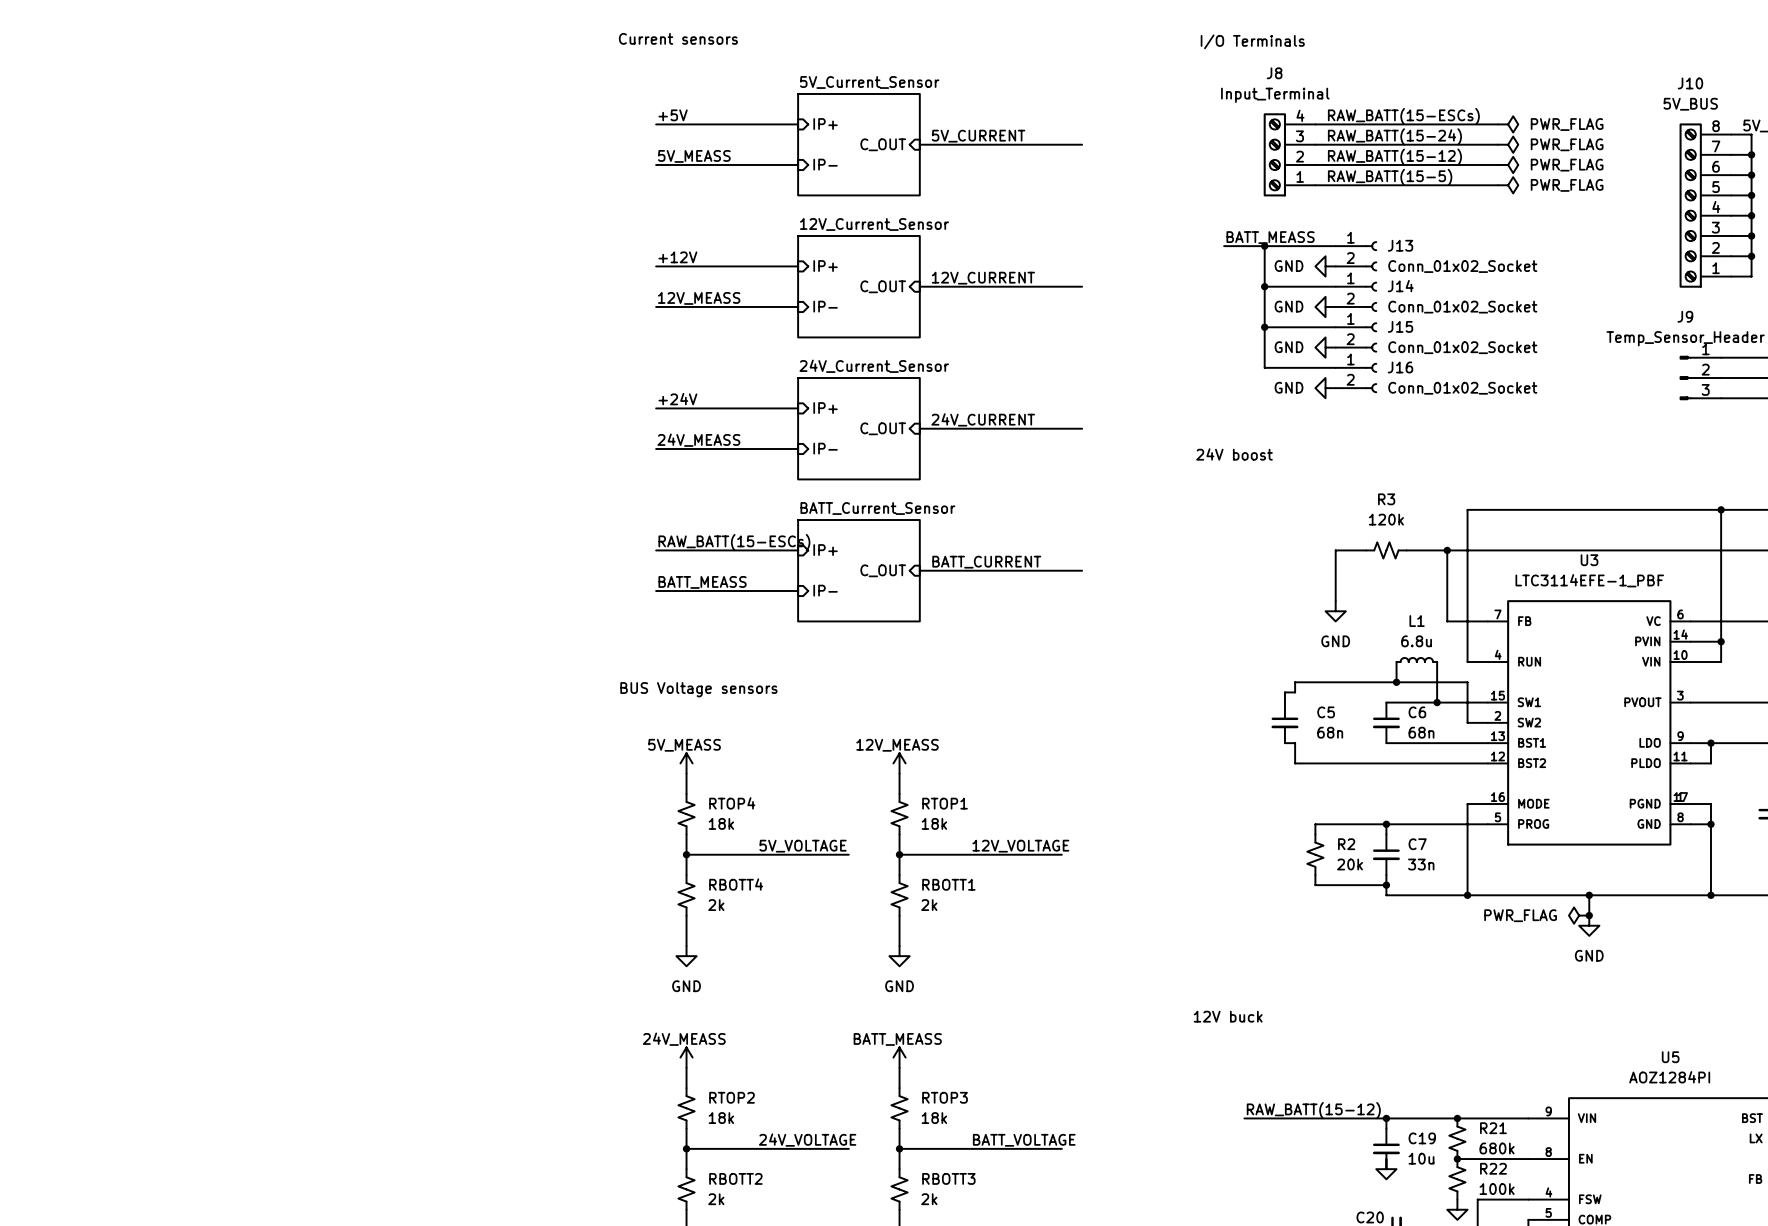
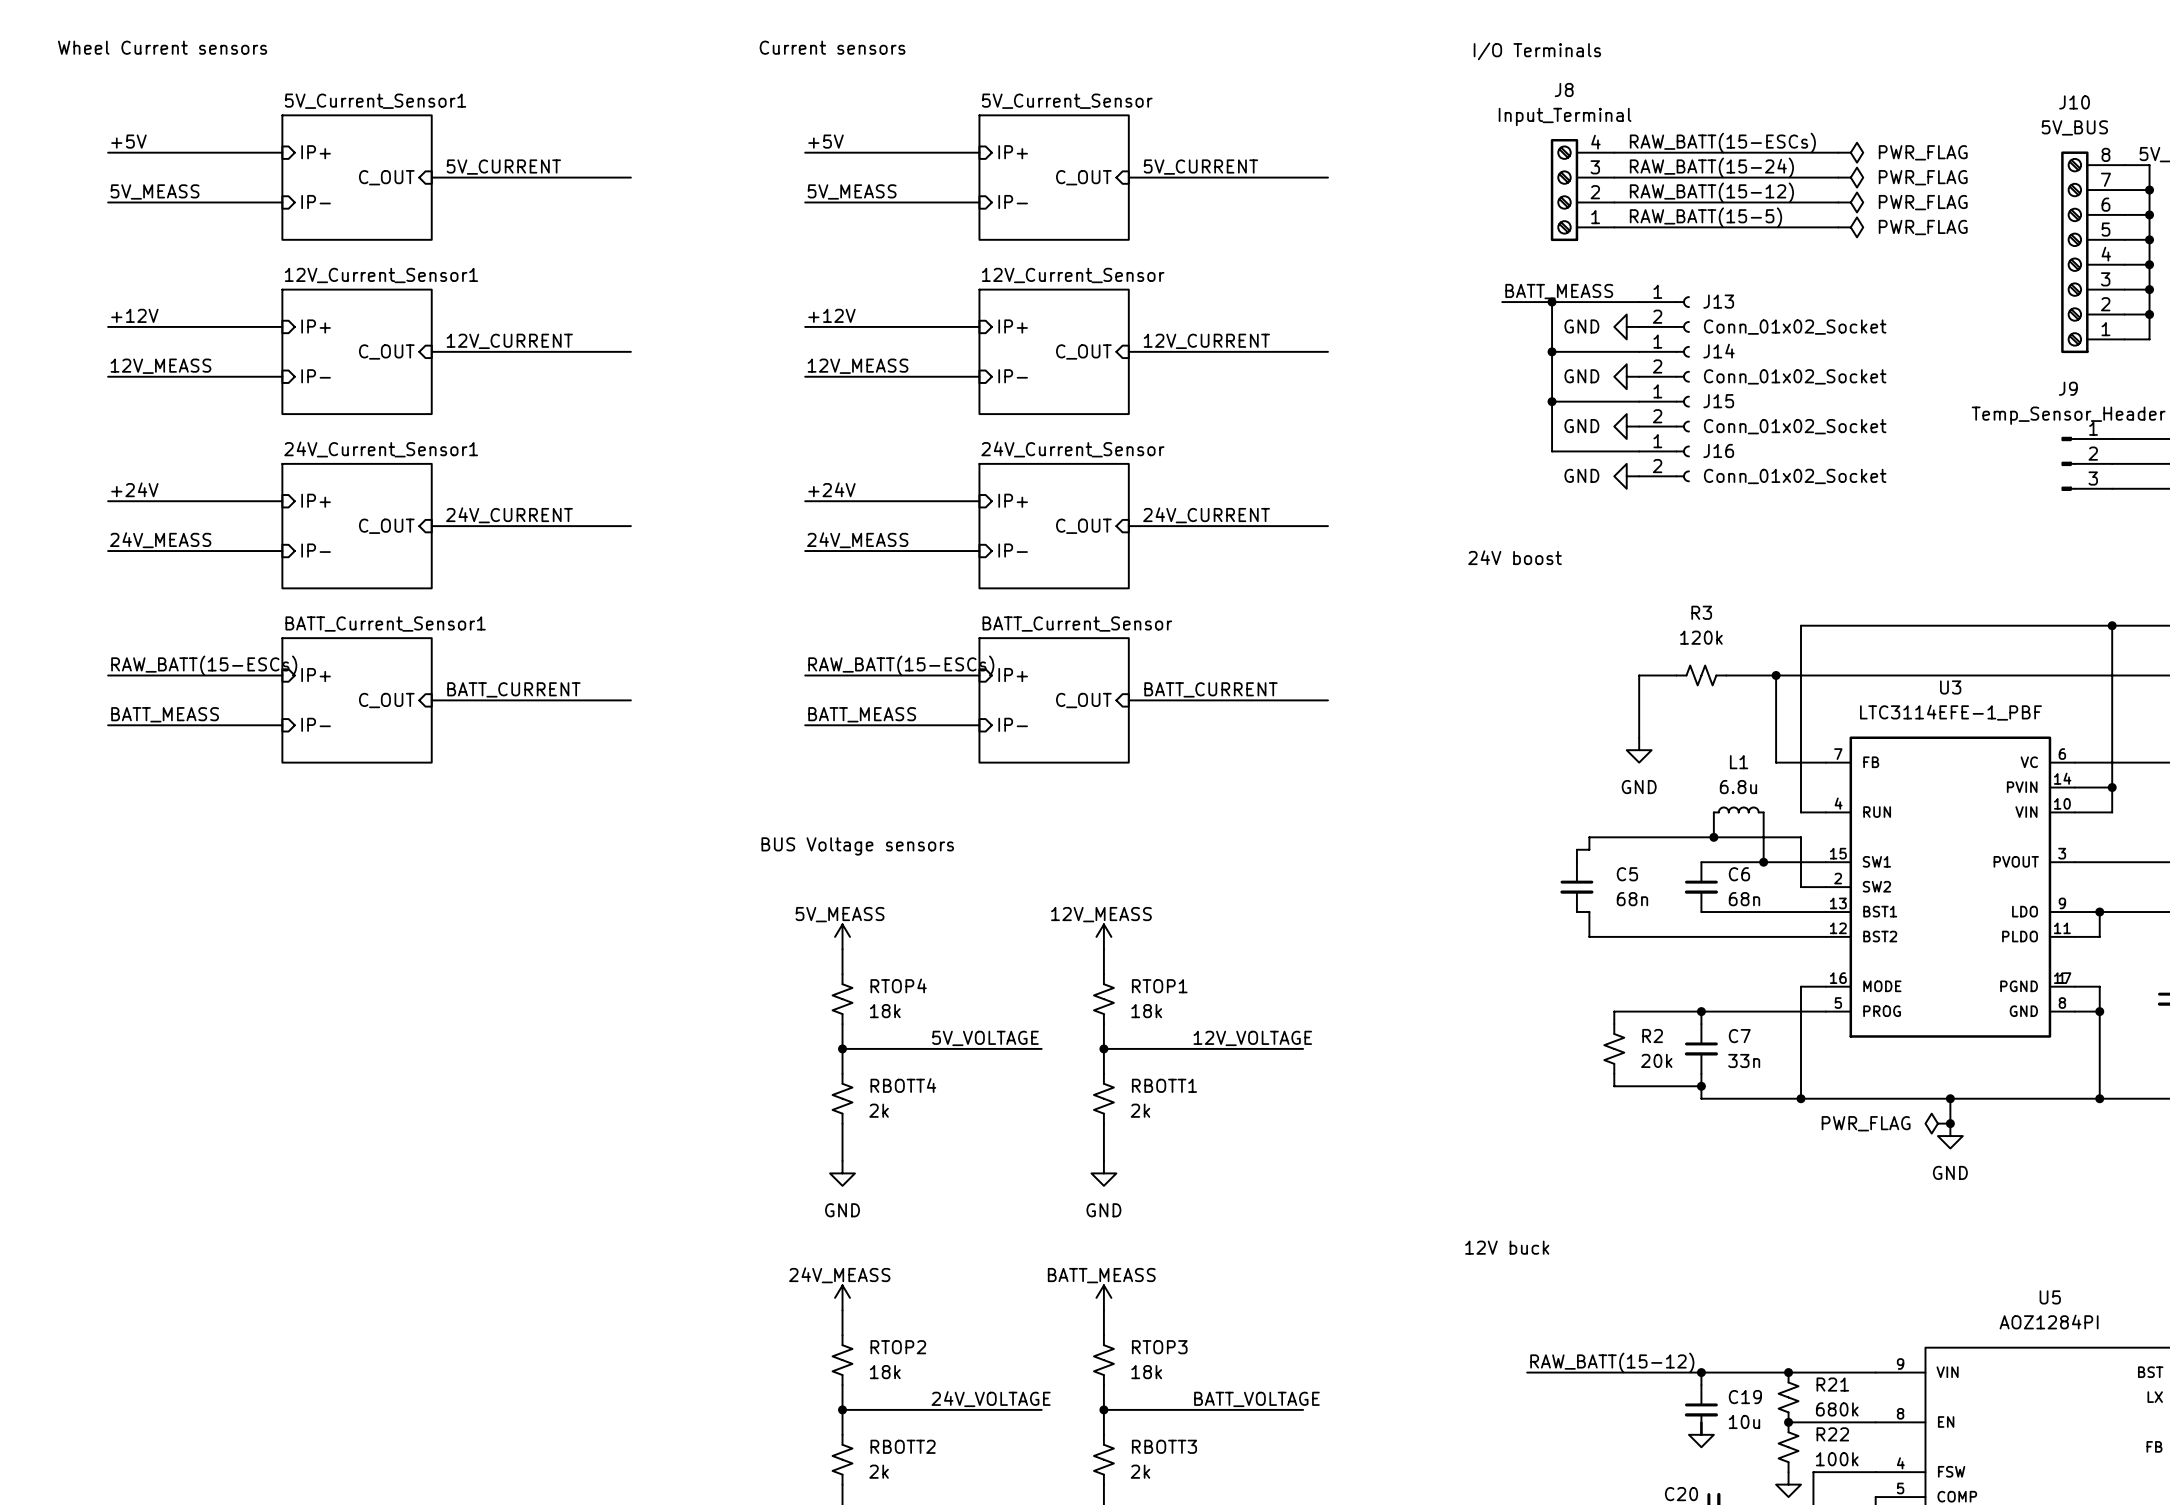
text: none -> Wheel Current sensors (162, 47)
label: none -> +5V (128, 141)
wire: none -> (108, 152) (282, 152)
sheet pin: none -> IP+ (316, 152)
label: none -> 5V_CURRENT (503, 167)
sheet 5V_Current_Sensor1: none -> (357, 177)
sheet pin: none -> C_OUT (386, 177)
wire: none -> (431, 177) (630, 177)
label: none -> 5V_MEASS (155, 191)
wire: none -> (108, 202) (282, 202)
sheet pin: none -> IP- (316, 202)
label: none -> +12V (134, 315)
wire: none -> (108, 326) (282, 326)
sheet pin: none -> IP+ (316, 326)
label: none -> 12V_CURRENT (509, 341)
sheet 12V_Current_Sensor1: none -> (357, 351)
sheet pin: none -> C_OUT (386, 351)
wire: none -> (431, 351) (630, 351)
label: none -> 12V_MEASS (160, 366)
wire: none -> (108, 376) (282, 376)
sheet pin: none -> IP- (316, 376)
label: none -> +24V (134, 489)
wire: none -> (108, 501) (282, 501)
sheet pin: none -> IP+ (316, 500)
label: none -> 24V_CURRENT (509, 515)
sheet 24V_Current_Sensor1: none -> (357, 526)
sheet pin: none -> C_OUT (386, 526)
wire: none -> (431, 526) (630, 526)
label: none -> 24V_MEASS (160, 540)
sheet pin: none -> IP- (316, 550)
wire: none -> (108, 551) (282, 551)
label: none -> RAW_BATT(15-ESCs) (204, 665)
wire: none -> (108, 675) (282, 675)
sheet pin: none -> IP+ (316, 675)
label: none -> BATT_CURRENT (513, 689)
sheet BATT_Current_Sensor1: none -> (357, 700)
sheet pin: none -> C_OUT (386, 700)
wire: none -> (431, 700) (630, 700)
label: none -> BATT_MEASS (165, 714)
sheet pin: none -> IP- (316, 724)
wire: none -> (108, 725) (282, 725)

